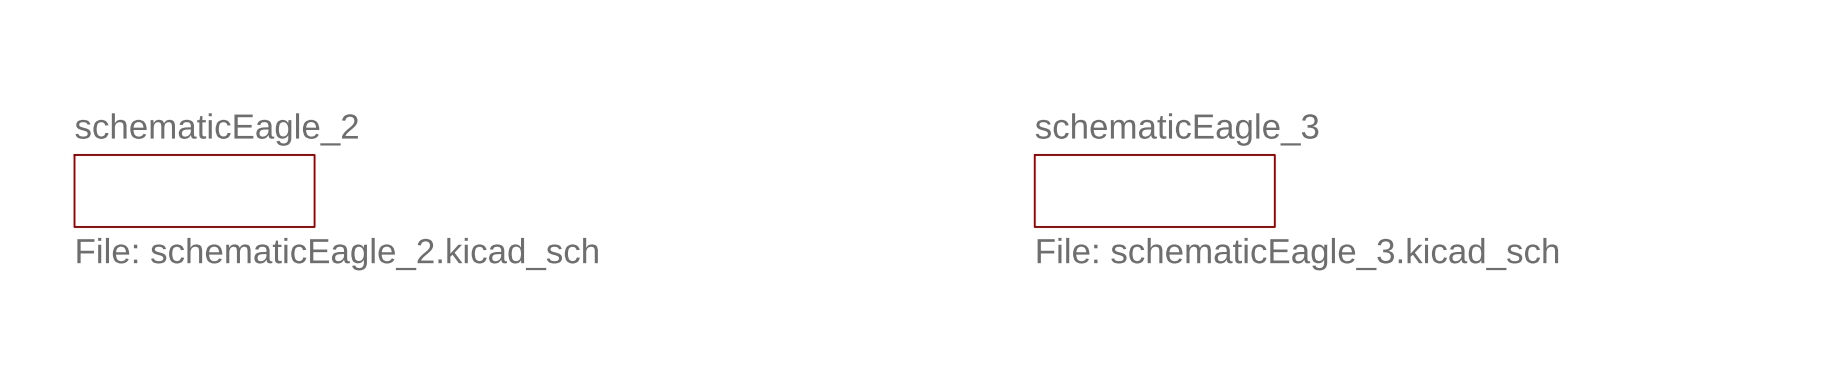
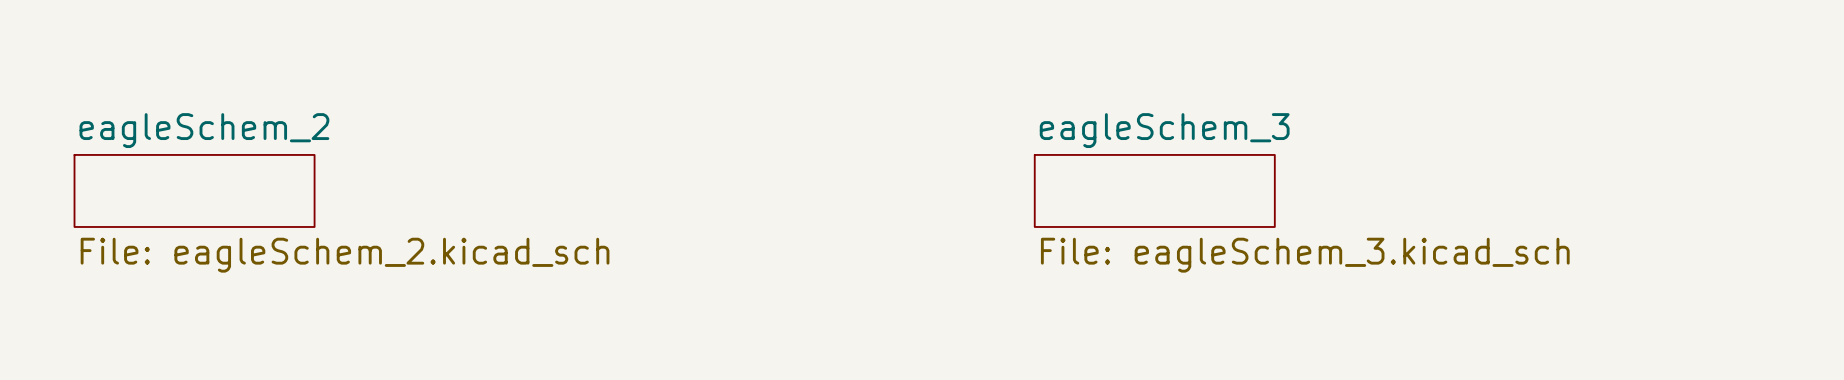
sheet schematicEagle_2 name: schematicEagle_2 (216, 129) -> eagleSchem_2 (204, 130)
sheet schematicEagle_3 name: schematicEagle_3 (1177, 129) -> eagleSchem_3 (1164, 130)
sheet schematicEagle_2 value: File: schematicEagle_2.kicad_sch (337, 254) -> File: eagleSchem_2.kicad_sch (345, 255)
sheet schematicEagle_3 value: File: schematicEagle_3.kicad_sch (1297, 254) -> File: eagleSchem_3.kicad_sch (1305, 255)

